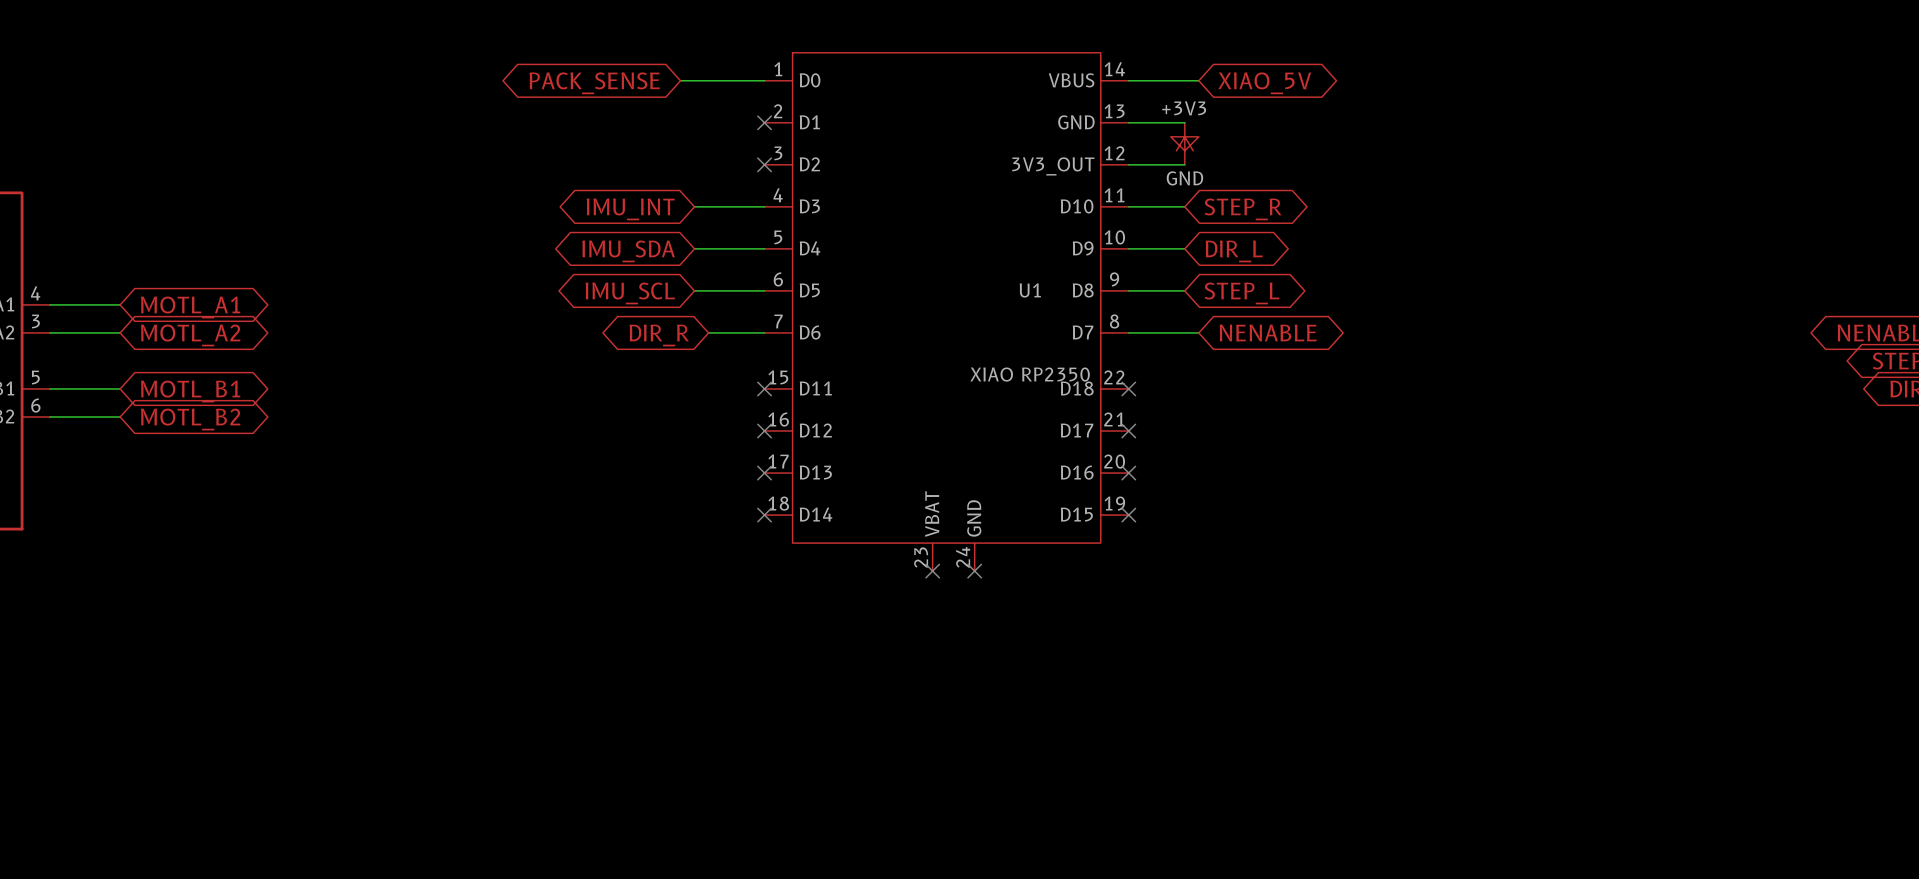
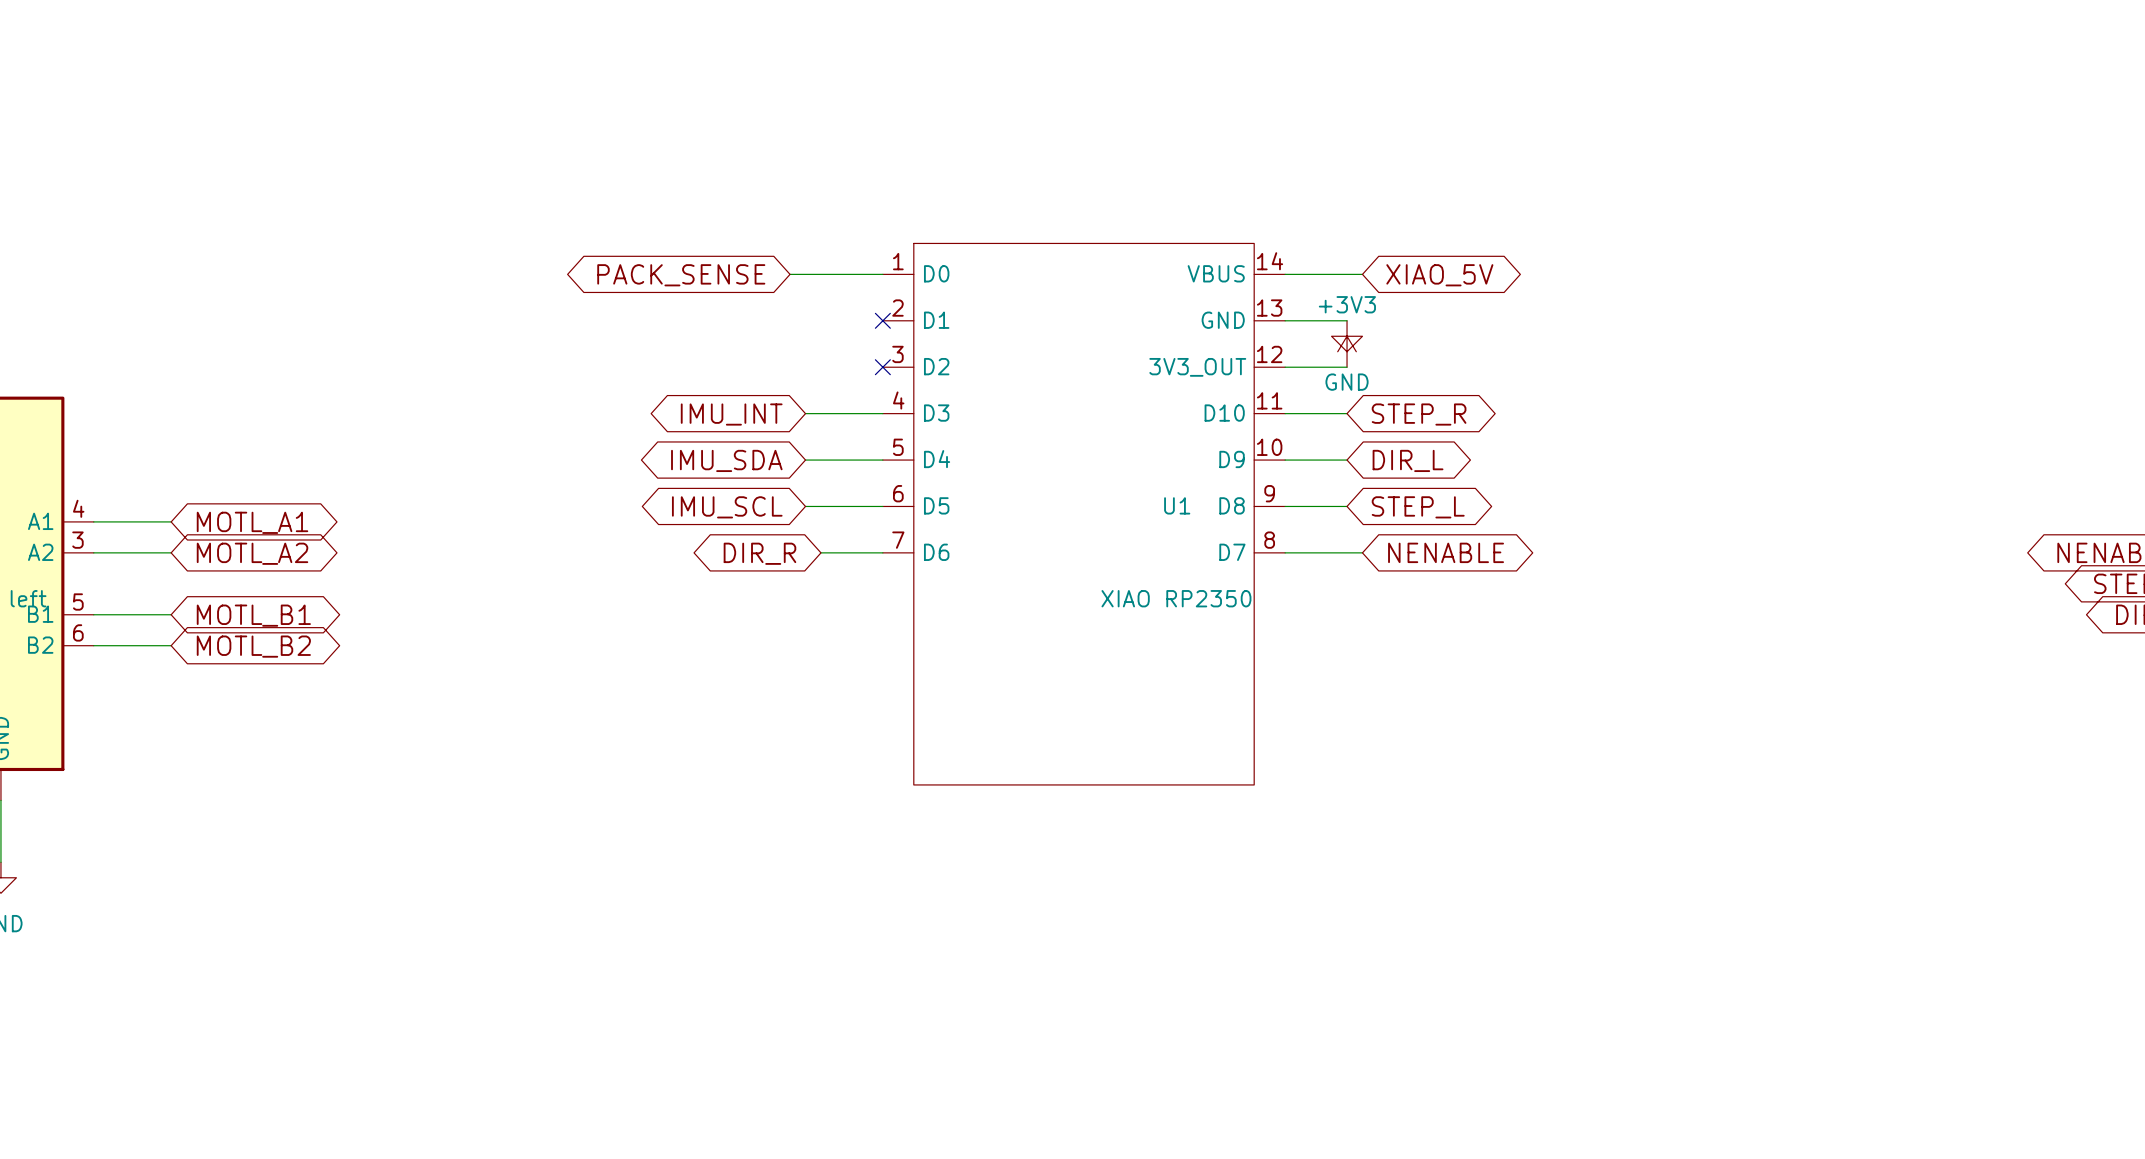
U1 symbol: [764, 52, 1129, 572] -> [882, 243, 1286, 785]
no-connect mark: (764, 388) -> none
no-connect mark: (1128, 388) -> none
no-connect mark: (764, 431) -> none
no-connect mark: (1128, 431) -> none
no-connect mark: (764, 473) -> none
no-connect mark: (1128, 473) -> none
no-connect mark: (764, 515) -> none
no-connect mark: (1128, 515) -> none
no-connect mark: (932, 571) -> none
no-connect mark: (974, 571) -> none

